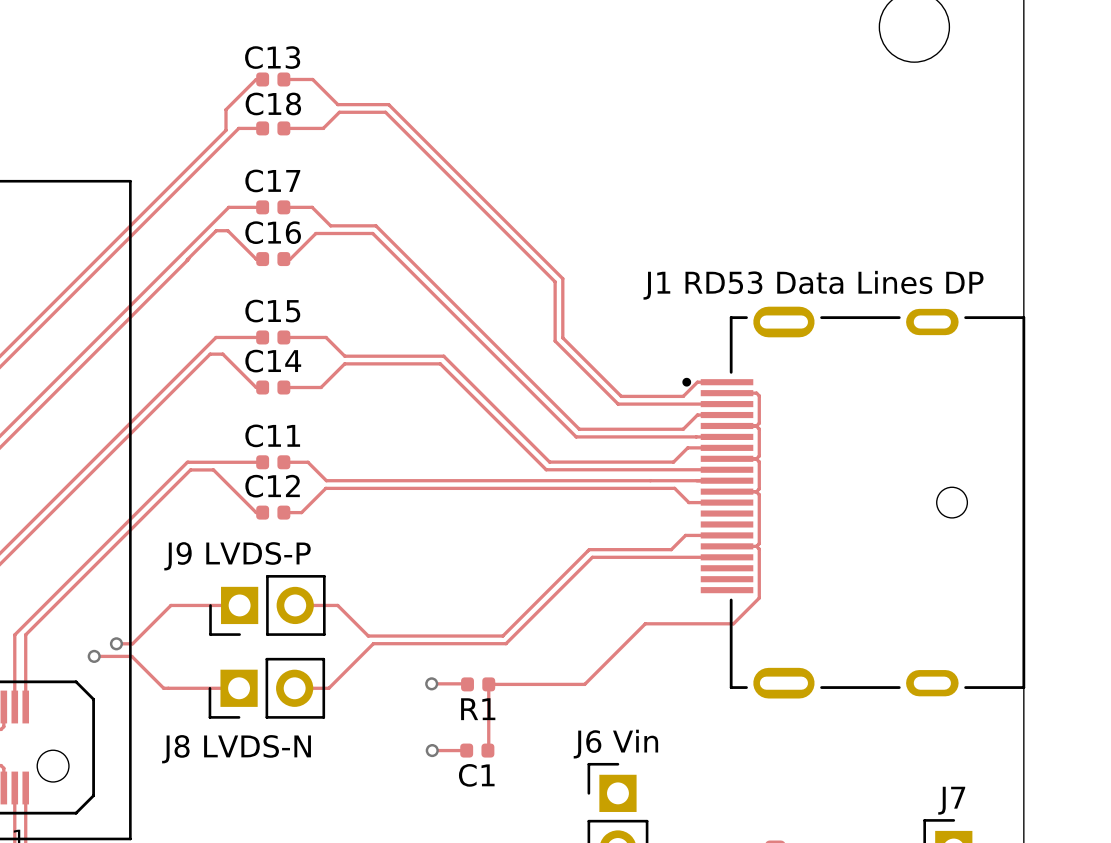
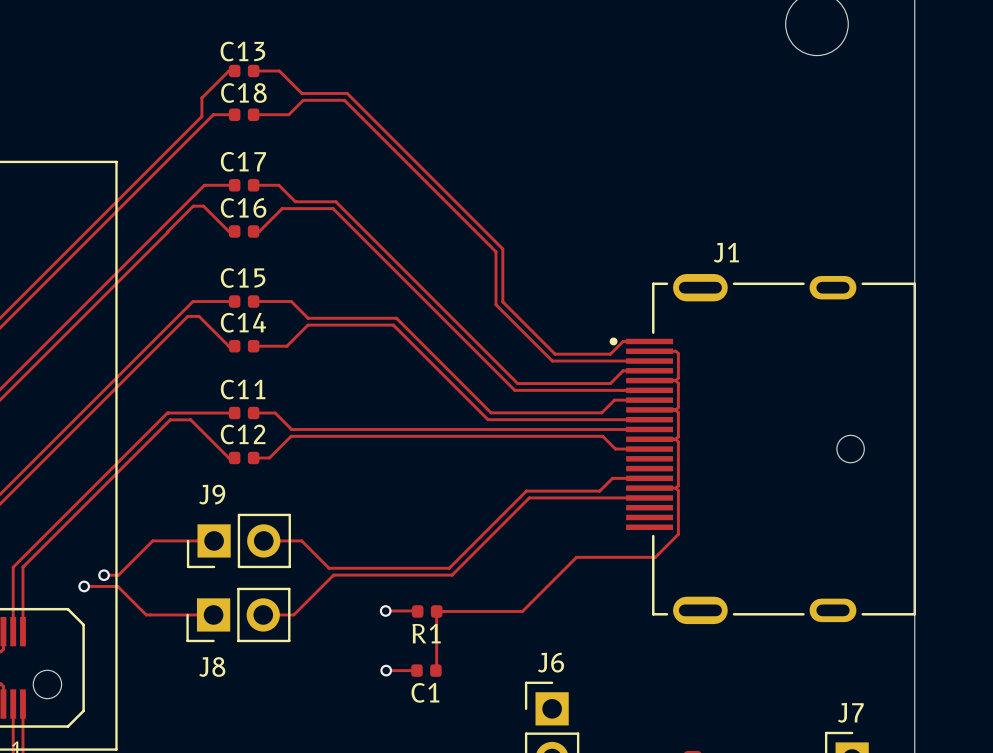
J1 RD53 Data Lines DP name: J1 RD53 Data Lines DP (813, 285) -> J1 (726, 252)
J9 LVDS-P name: J9 LVDS-P (237, 556) -> J9 (212, 494)
J6 Vin name: J6 Vin (615, 744) -> J6 (551, 662)
J8 LVDS-N name: J8 LVDS-N (236, 749) -> J8 (212, 666)

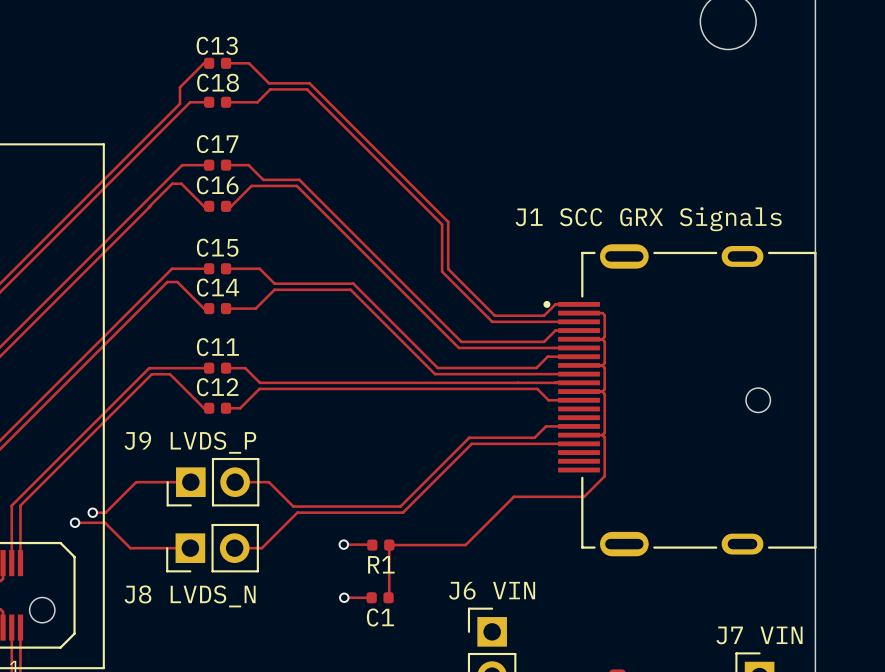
J1 name: J1 (726, 252) -> J1 SCC GRX Signals (648, 219)
J9 name: J9 (212, 494) -> J9 LVDS_P (190, 442)
J6 name: J6 (551, 662) -> J6 VIN (492, 590)
J8 name: J8 (212, 666) -> J8 LVDS_N (190, 596)
J7 name: J7 (850, 712) -> J7 VIN (759, 635)

